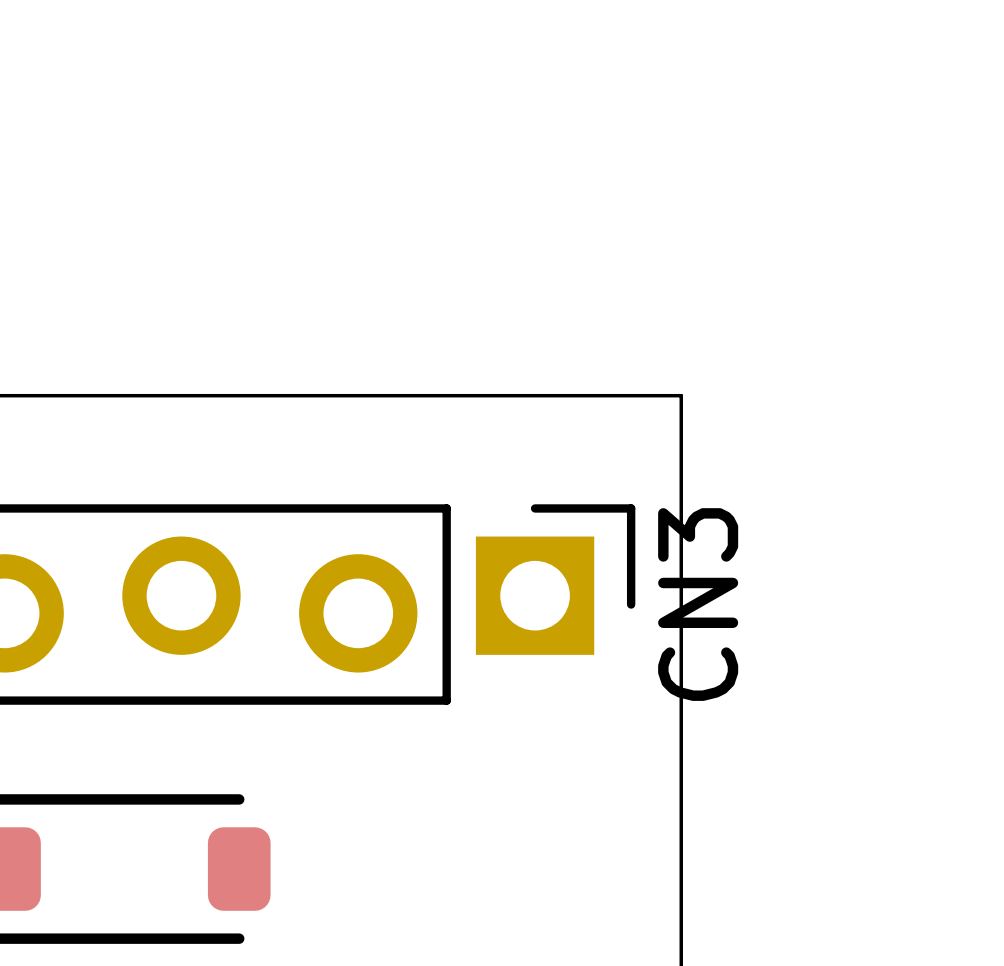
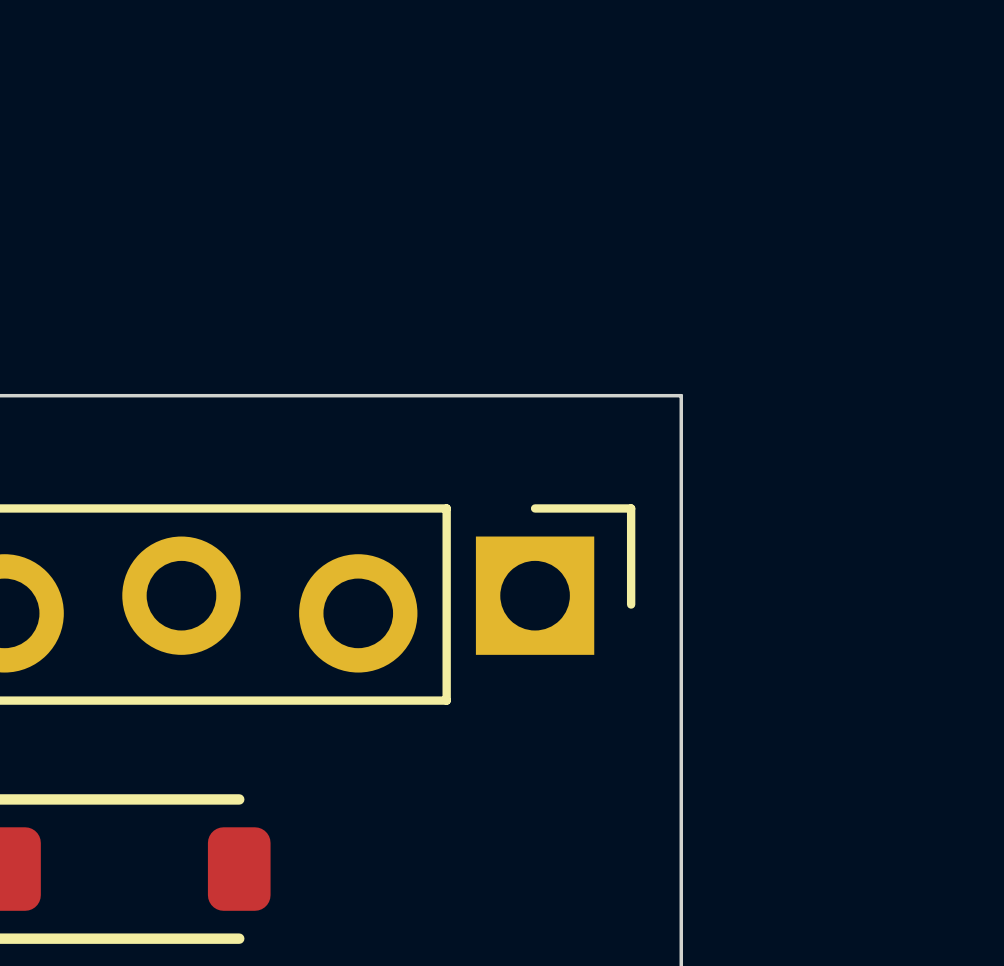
CN3 name: CN3 (698, 604) -> none

